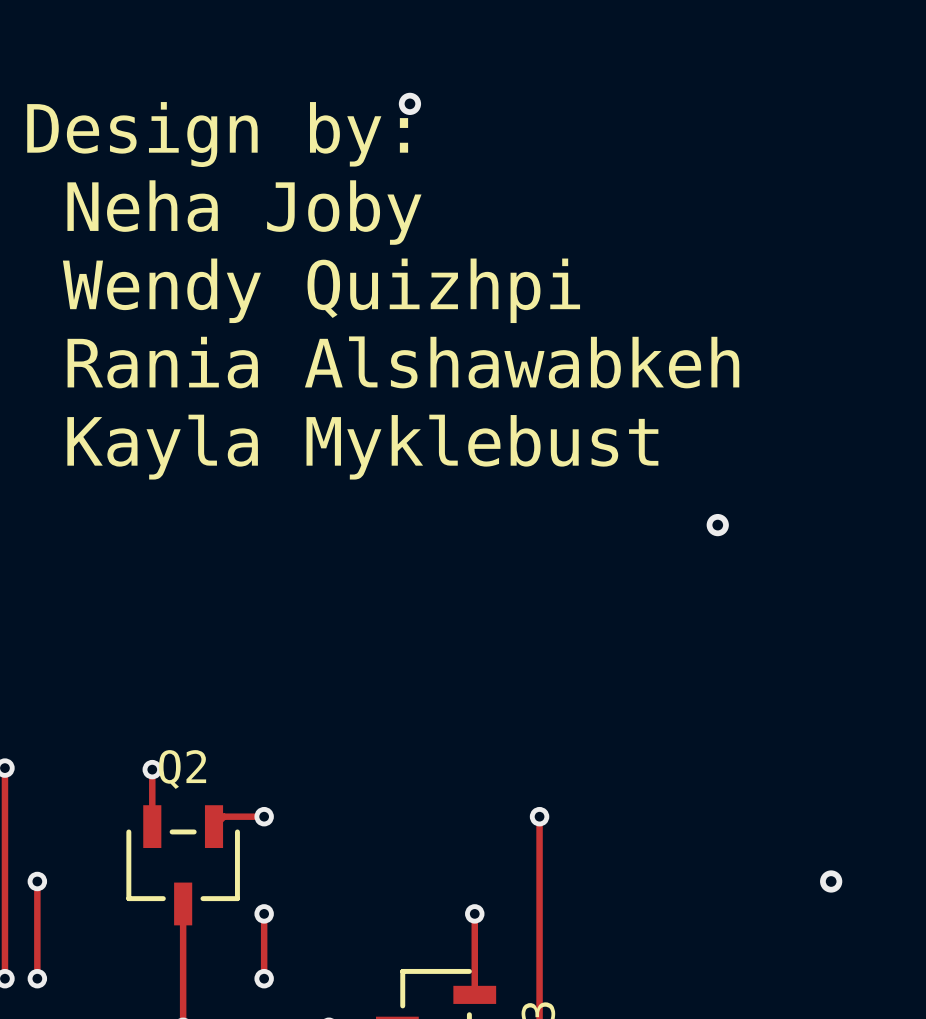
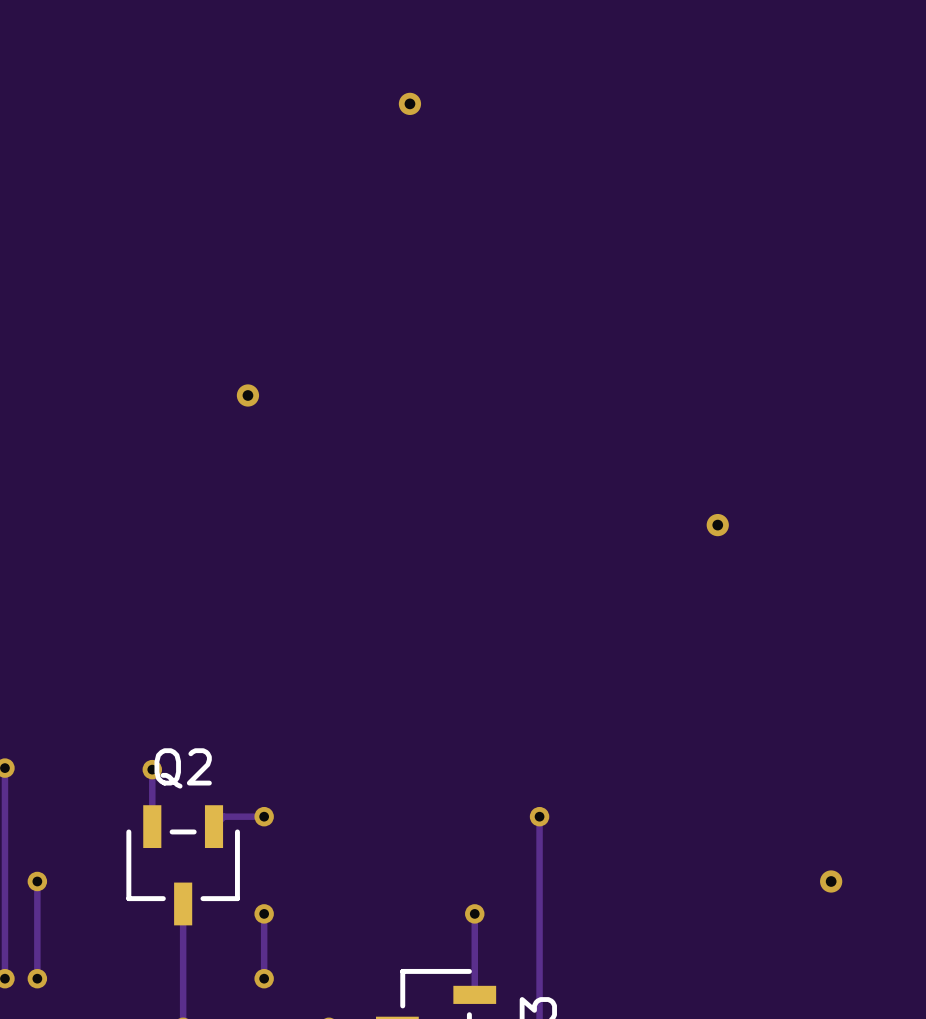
text: Design by: (217, 134) -> none
text: Neha Joby (244, 212) -> none
text: Wendy Quizhpi (321, 290) -> none
text: Rania Alshawabkeh (403, 362) -> none
via: none -> (247, 395)
text: Kayla Myklebust (362, 447) -> none

